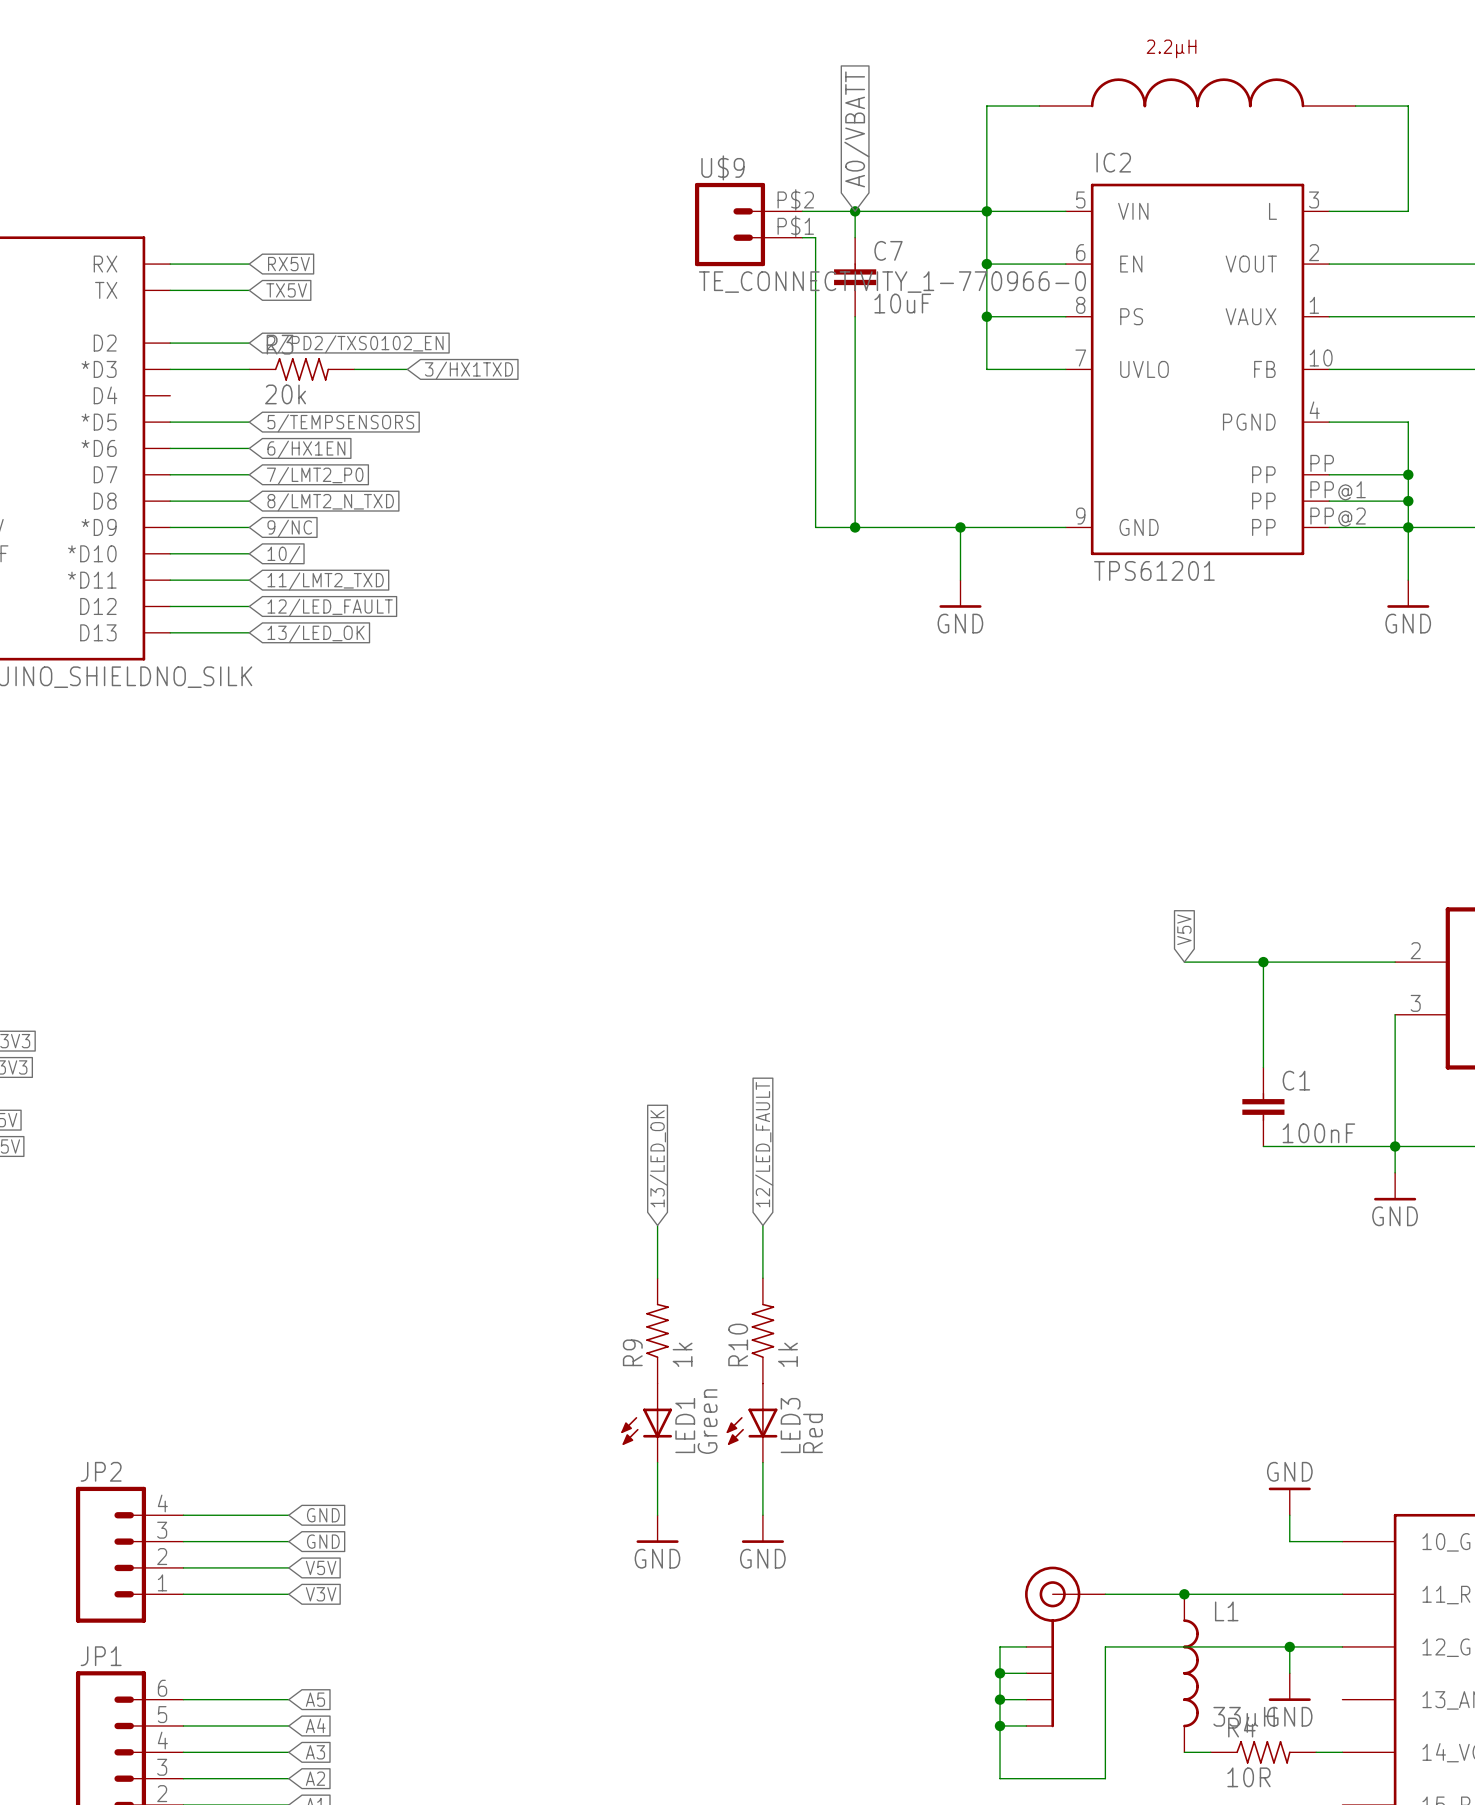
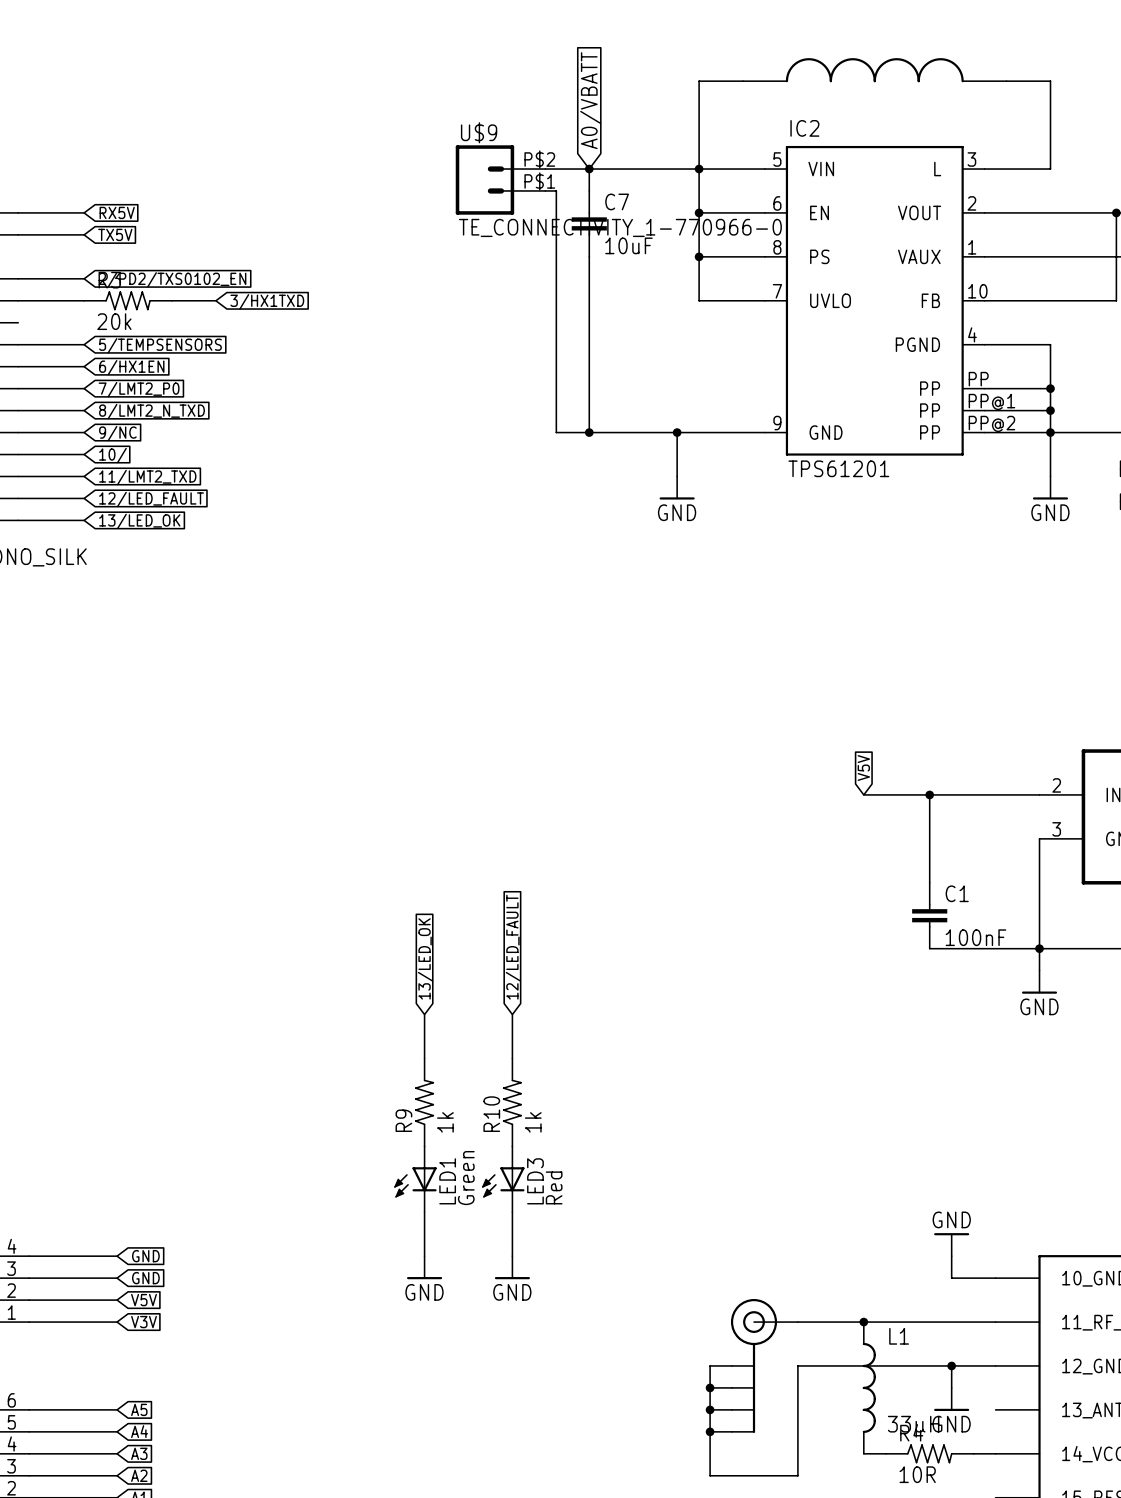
part value: 2.2µH (1171, 48) -> none

